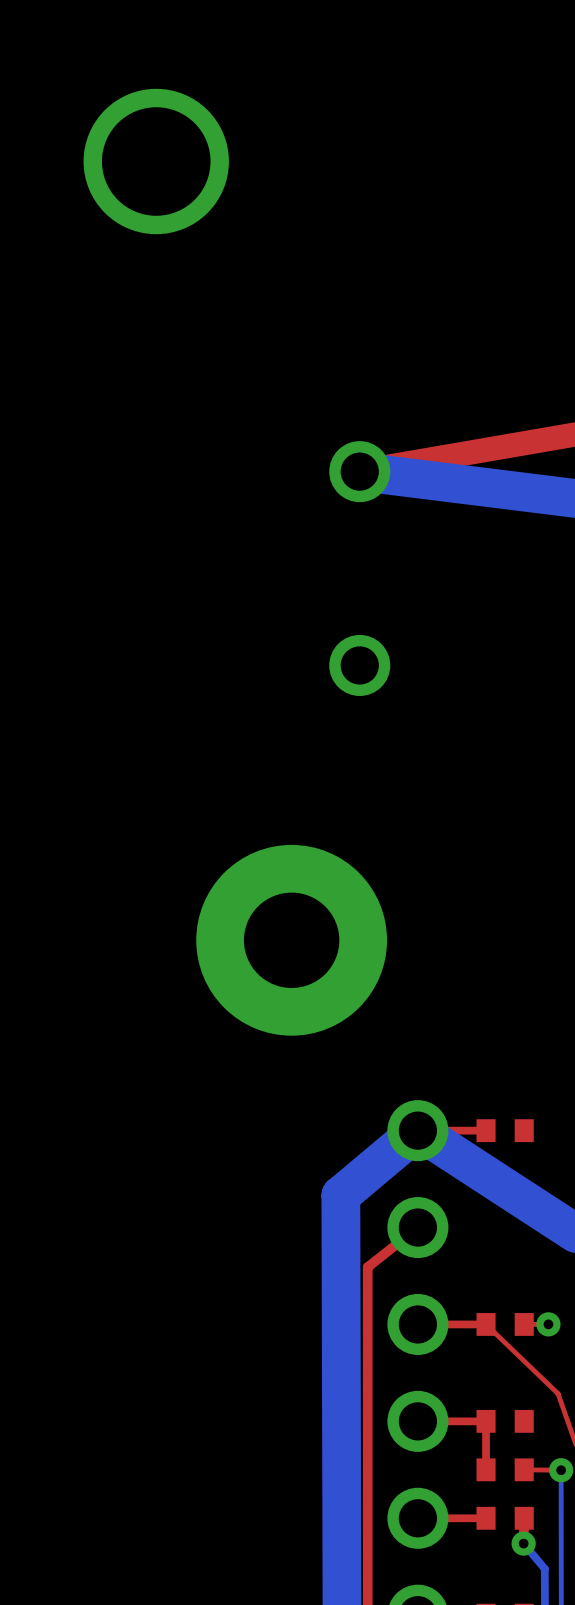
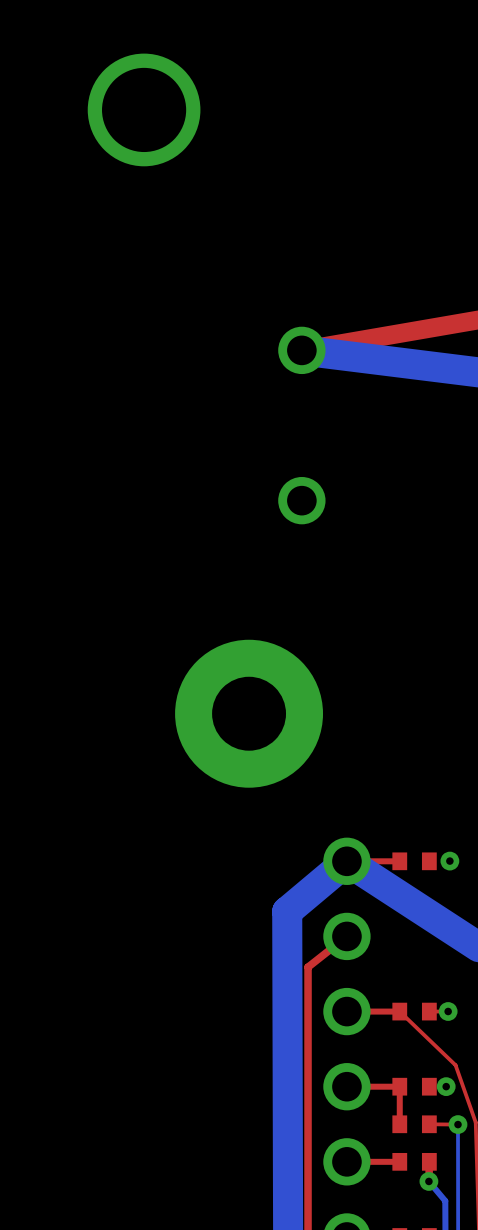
via: none -> (449, 861)
via: none -> (446, 1086)

